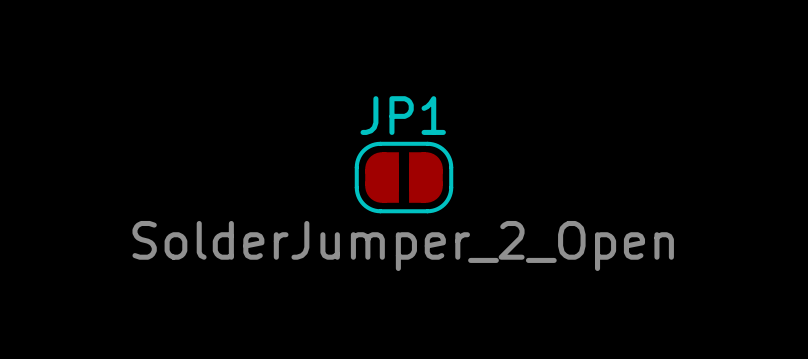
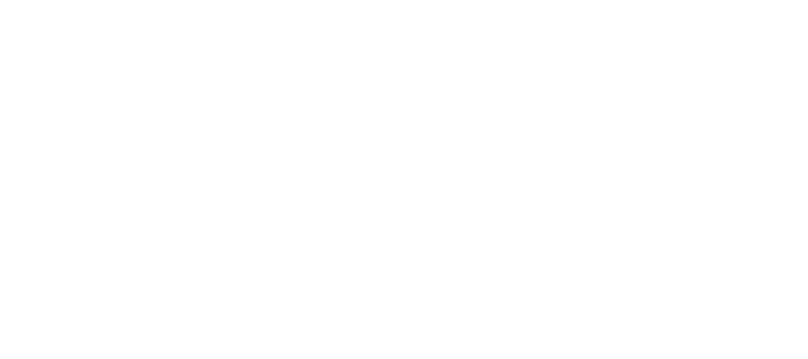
JP1: SolderJumper_2_Open (404, 177) -> none

